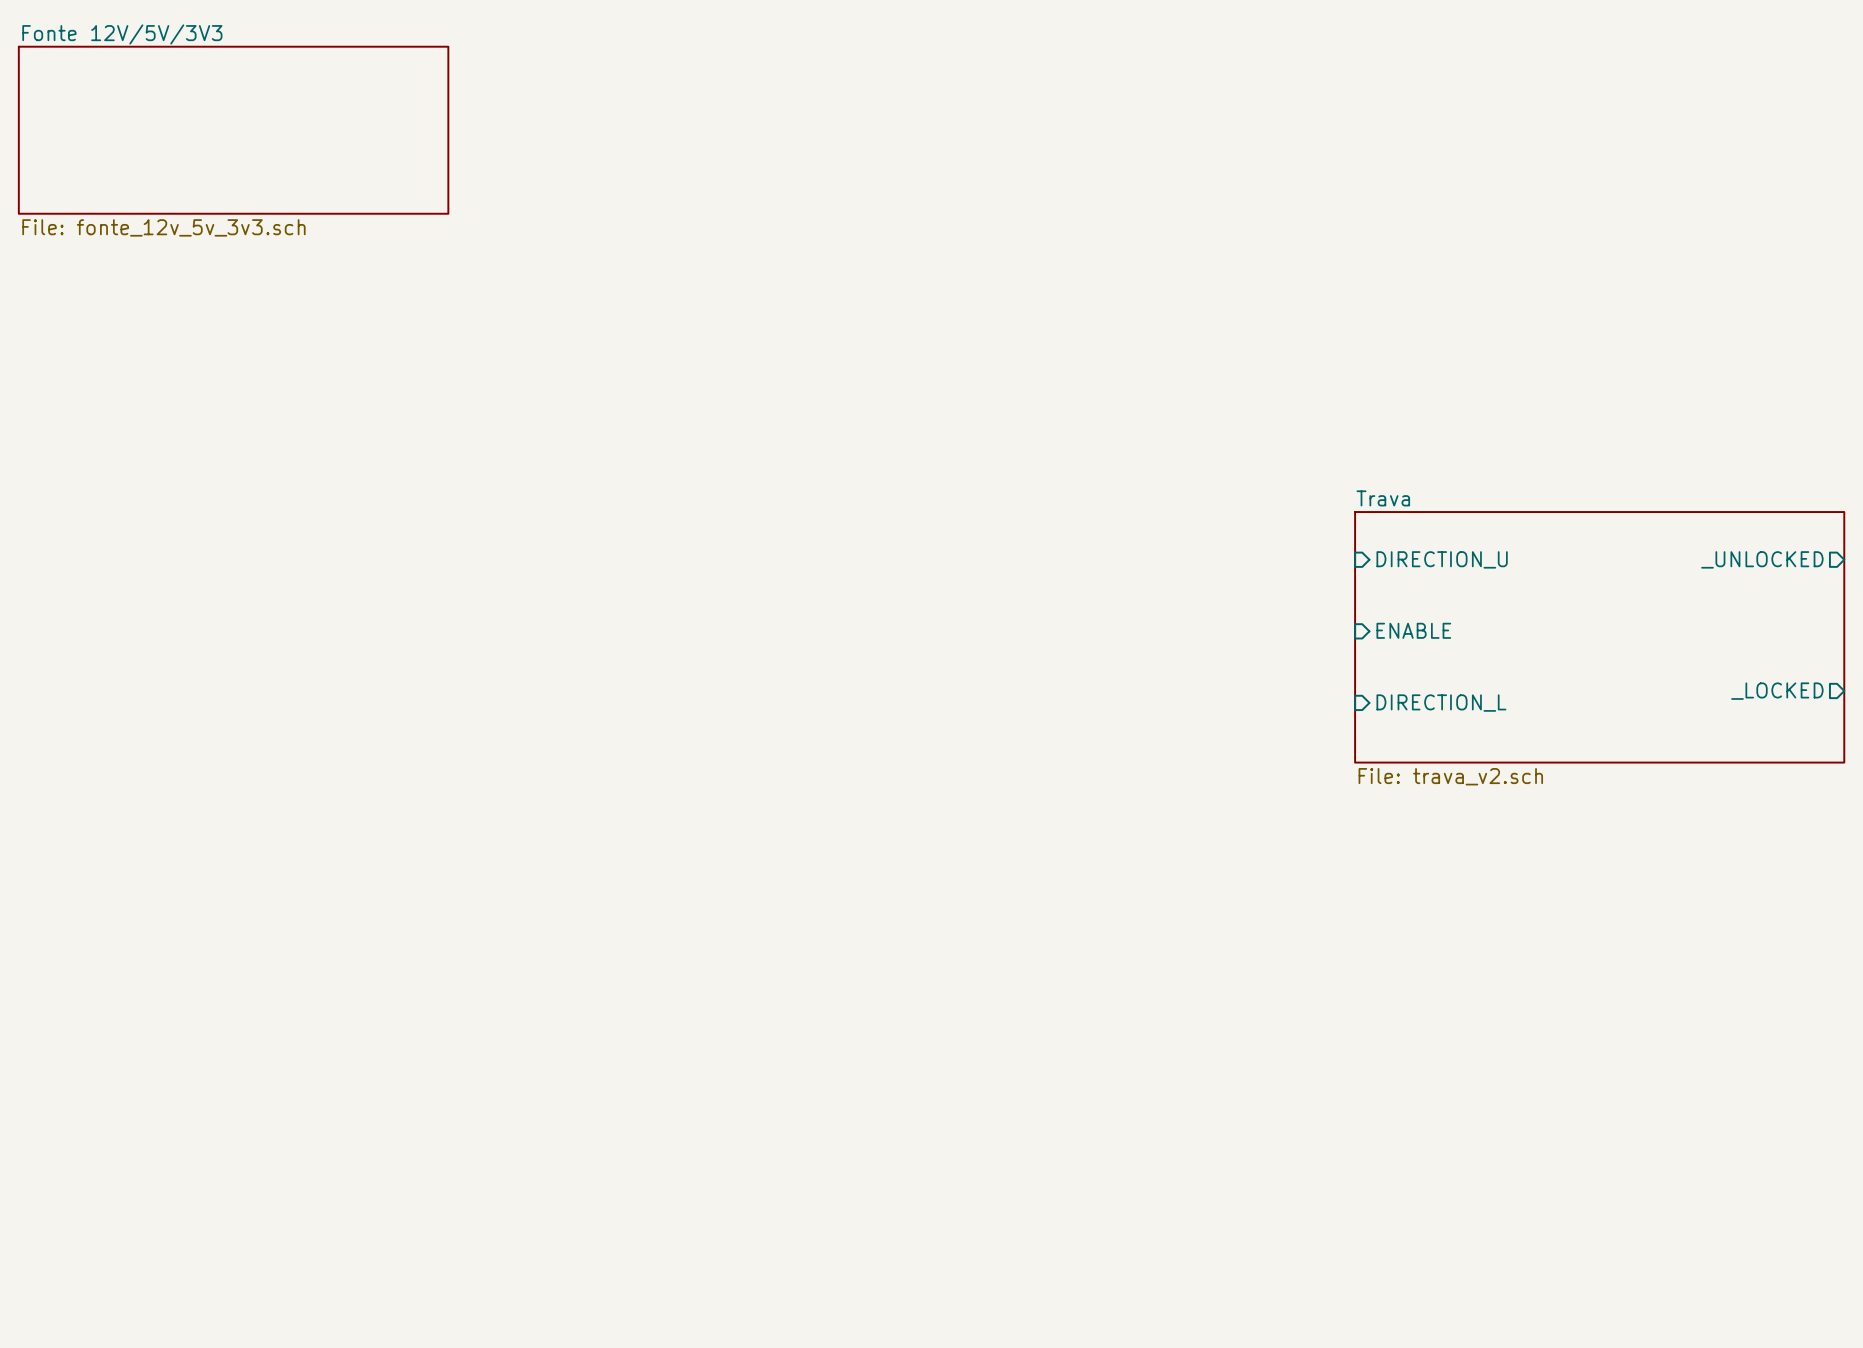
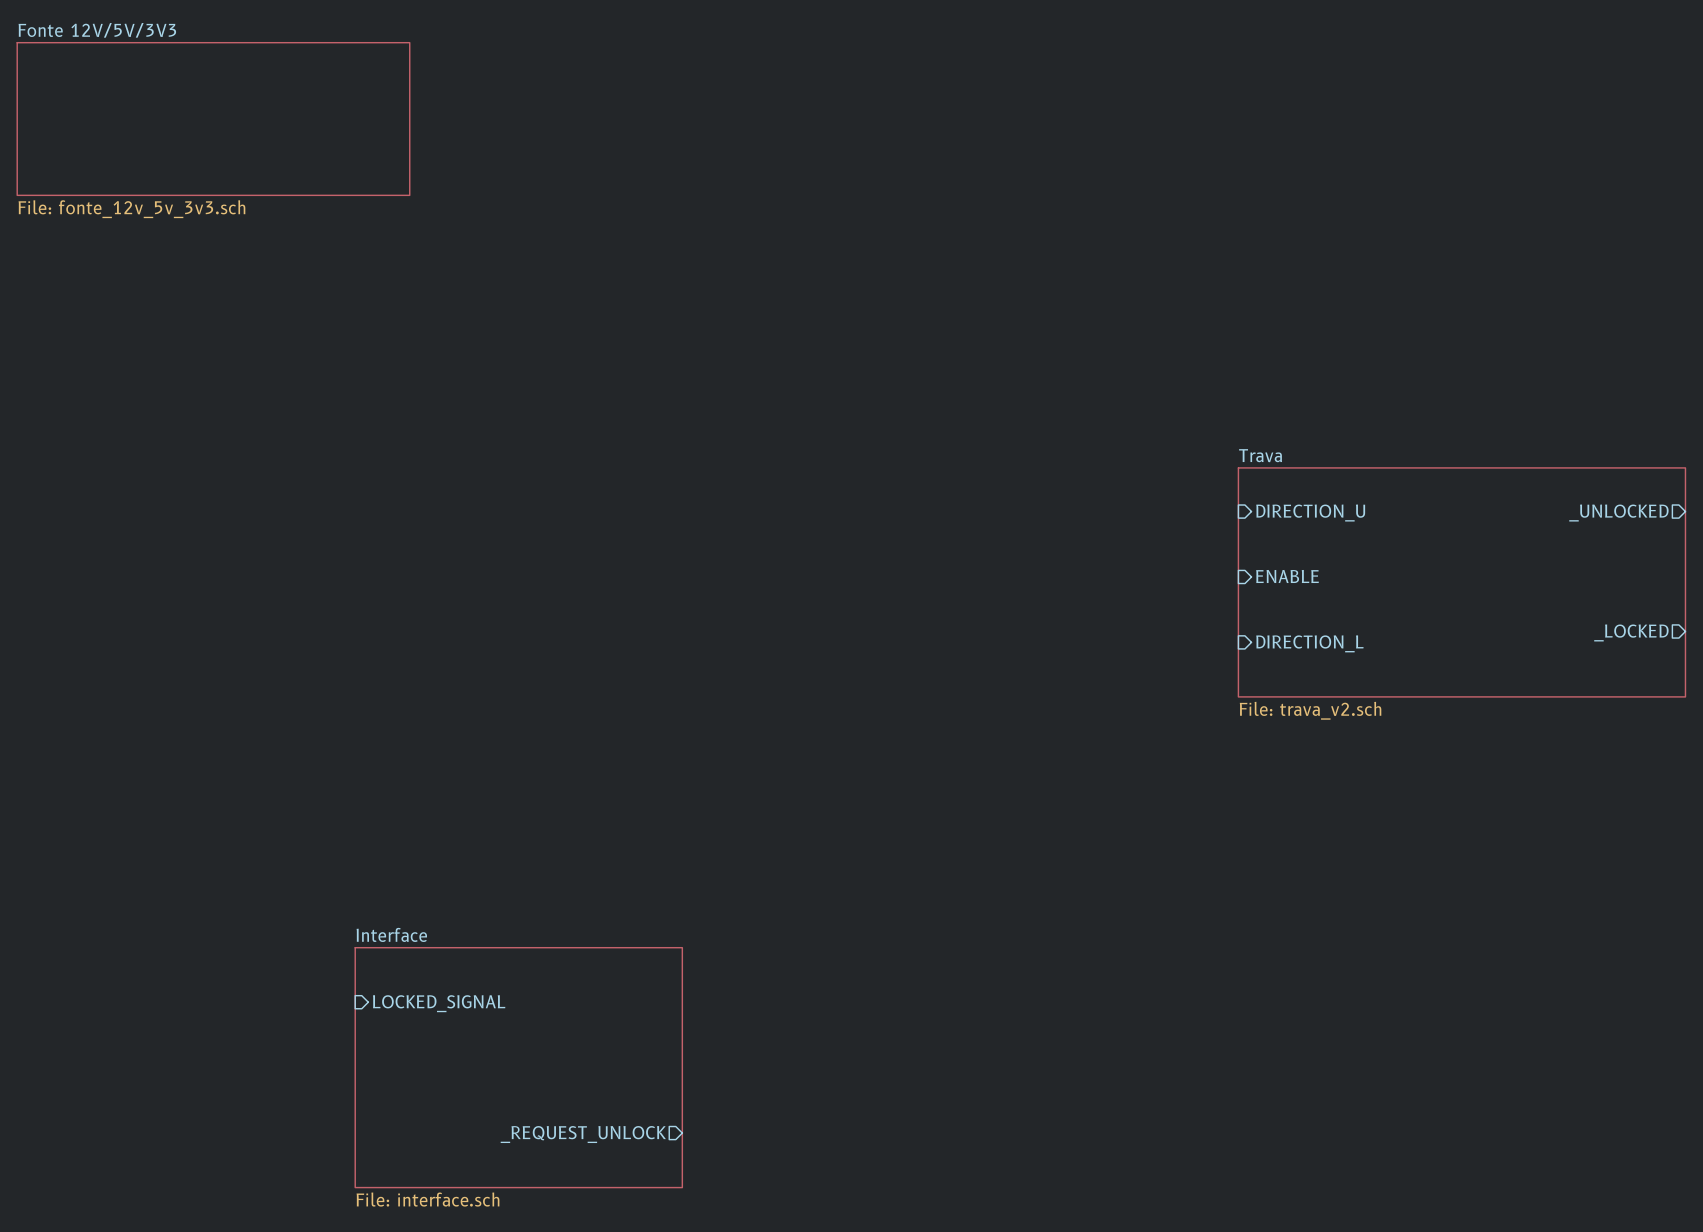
sheet pin: none -> LOCKED_SIGNAL (439, 1003)
sheet Interface: none -> File: interface.sch (518, 1067)
sheet pin: none -> _REQUEST_UNLOCK (583, 1134)

